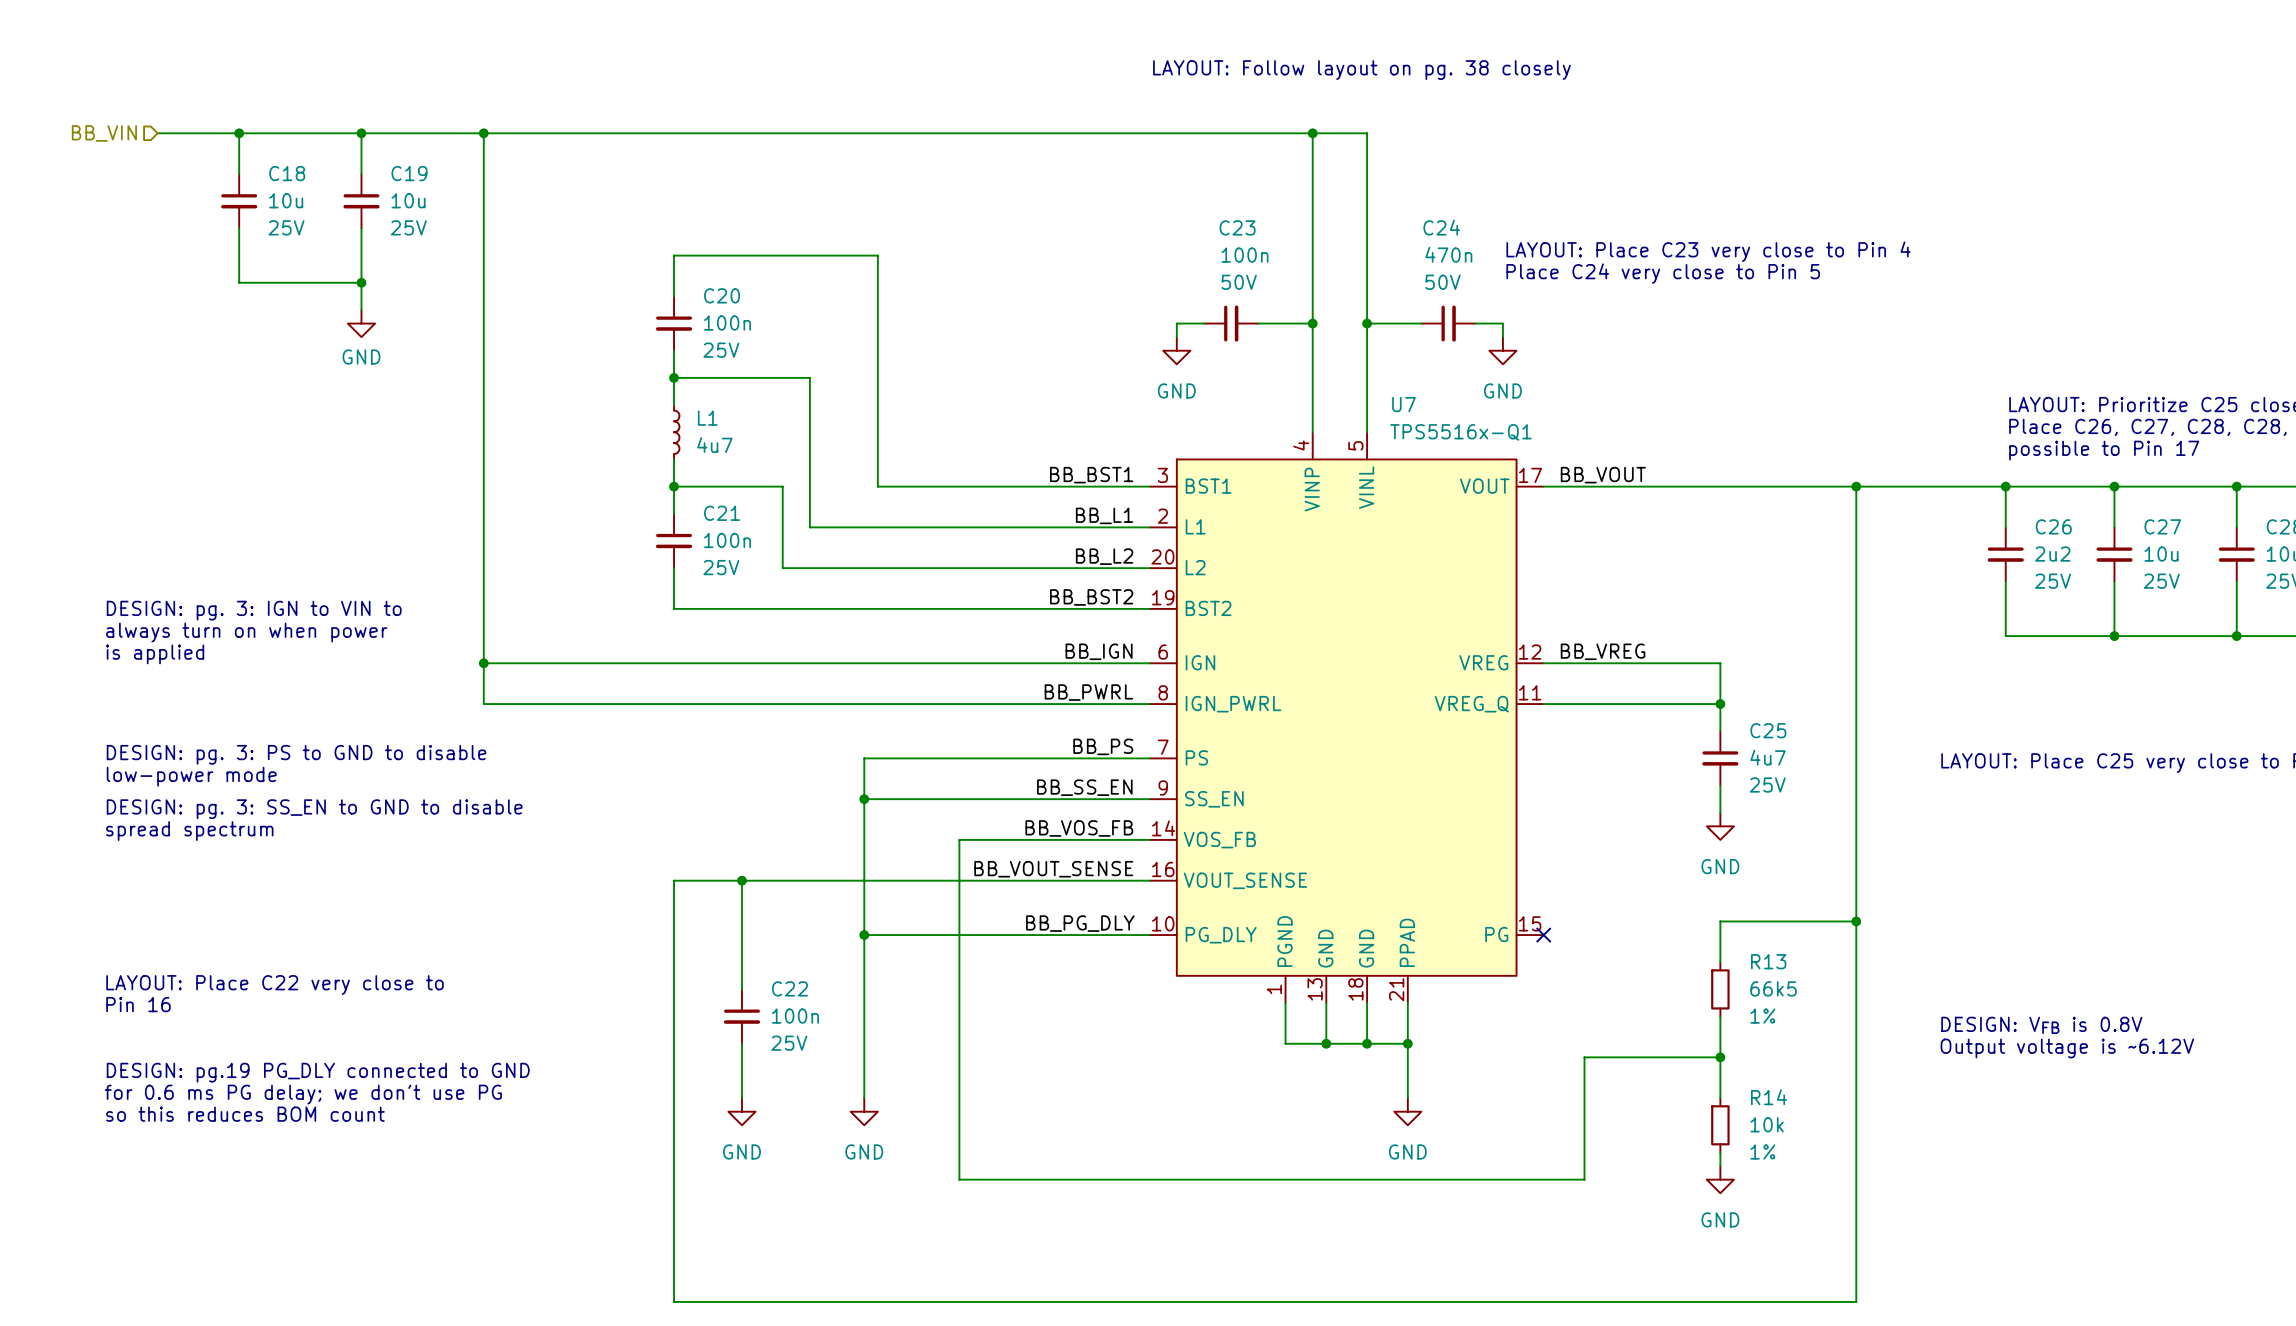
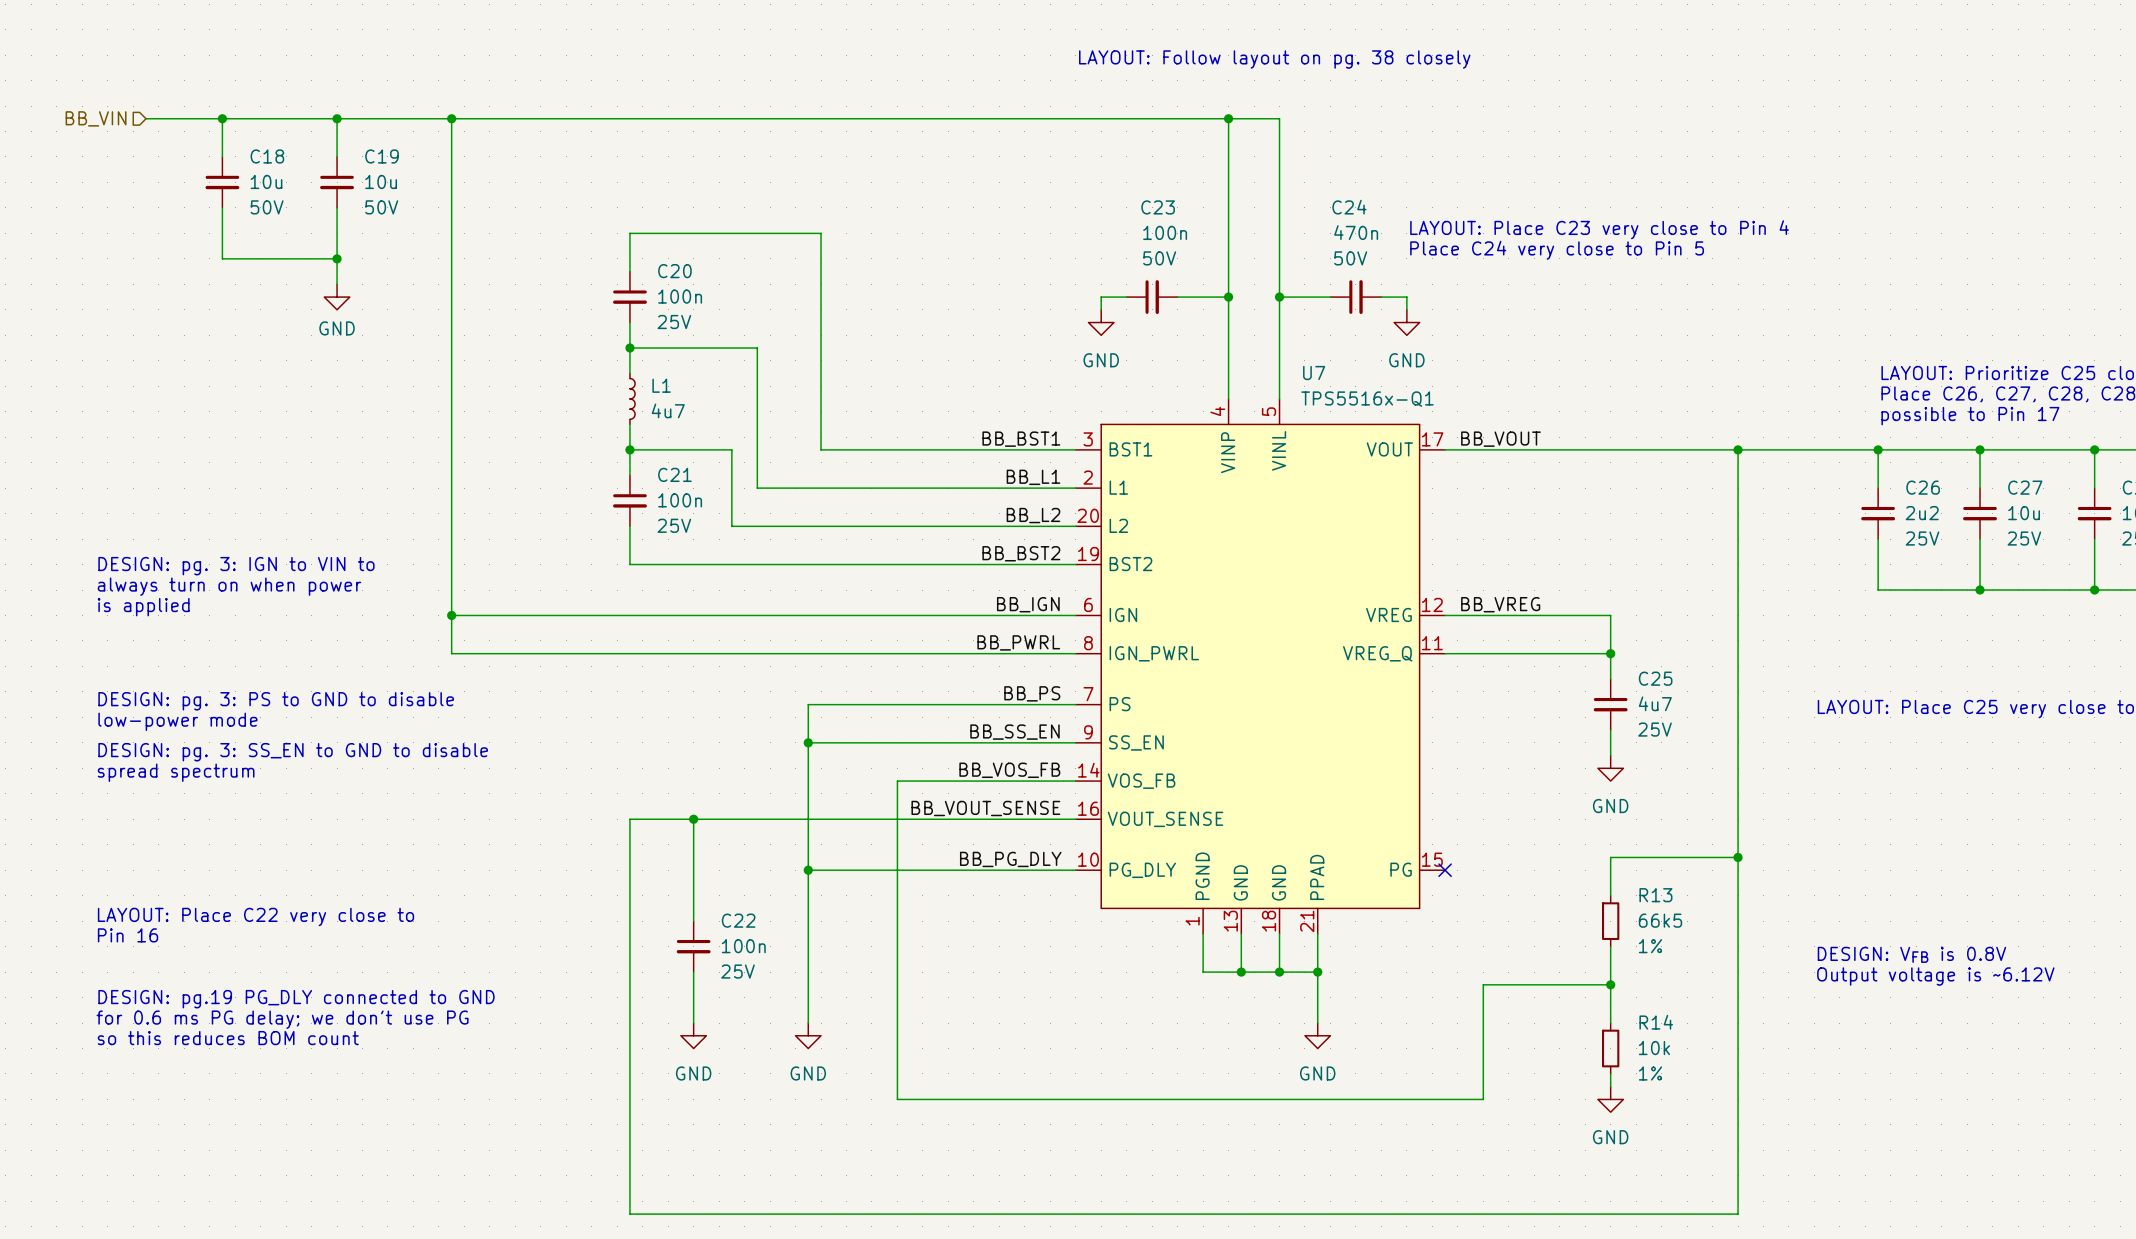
C18 text: 25V (286, 227) -> 50V (267, 207)
C19 text: 25V (408, 227) -> 50V (381, 207)

